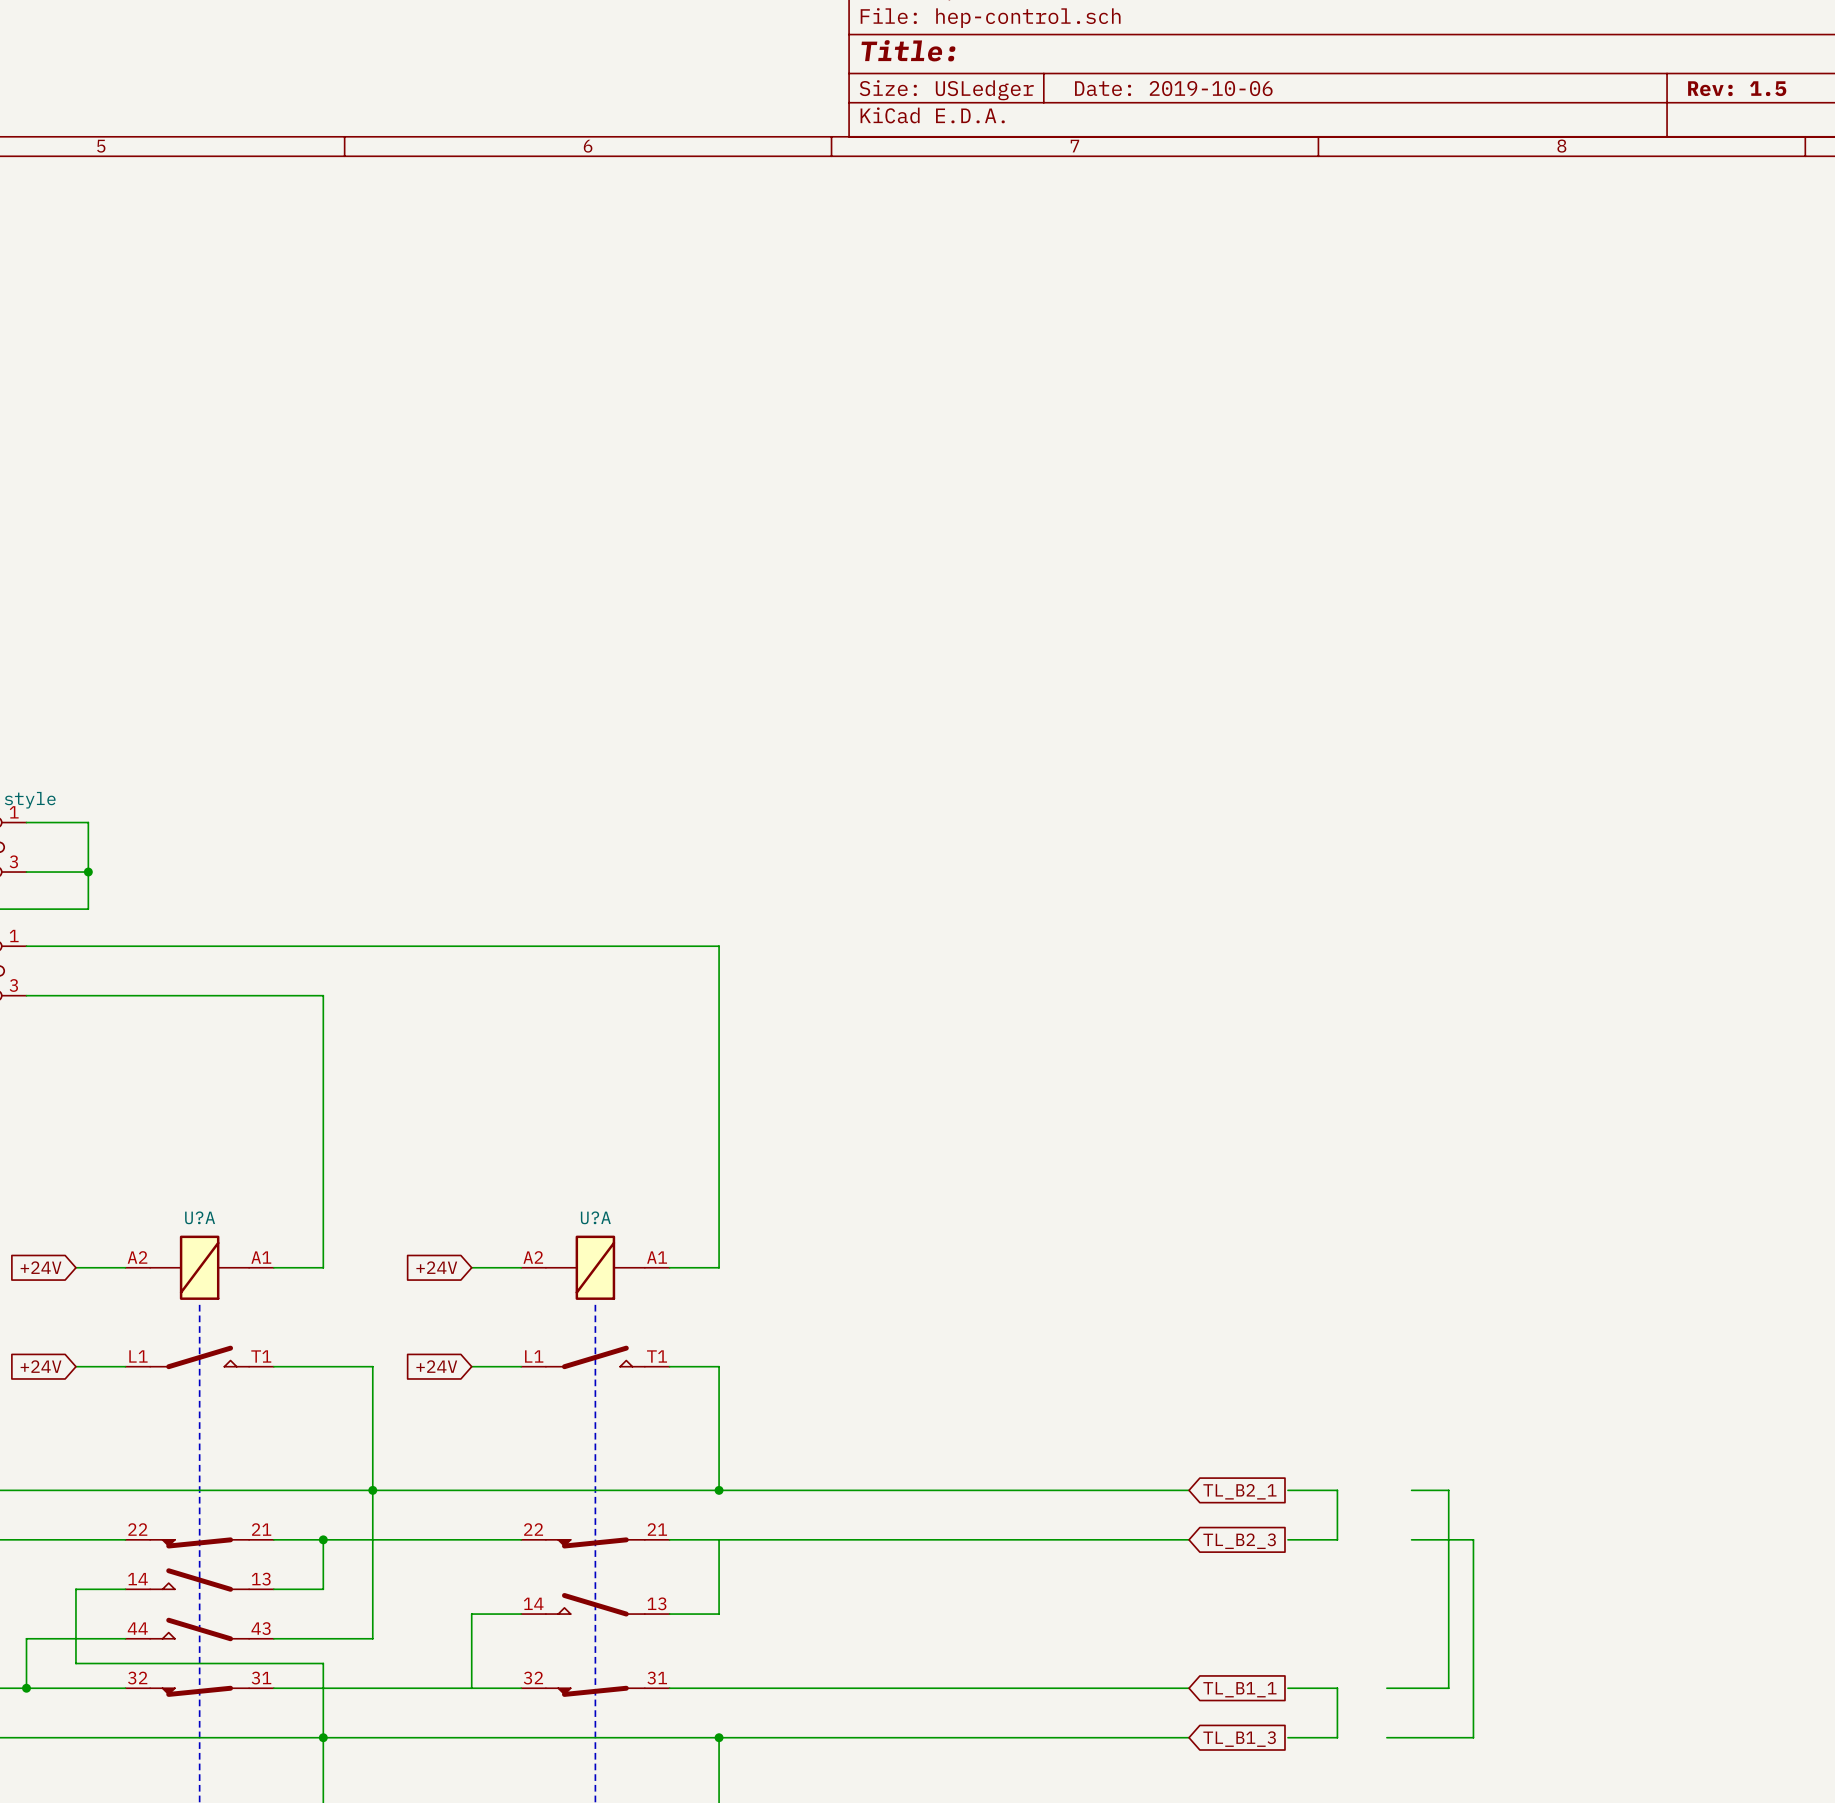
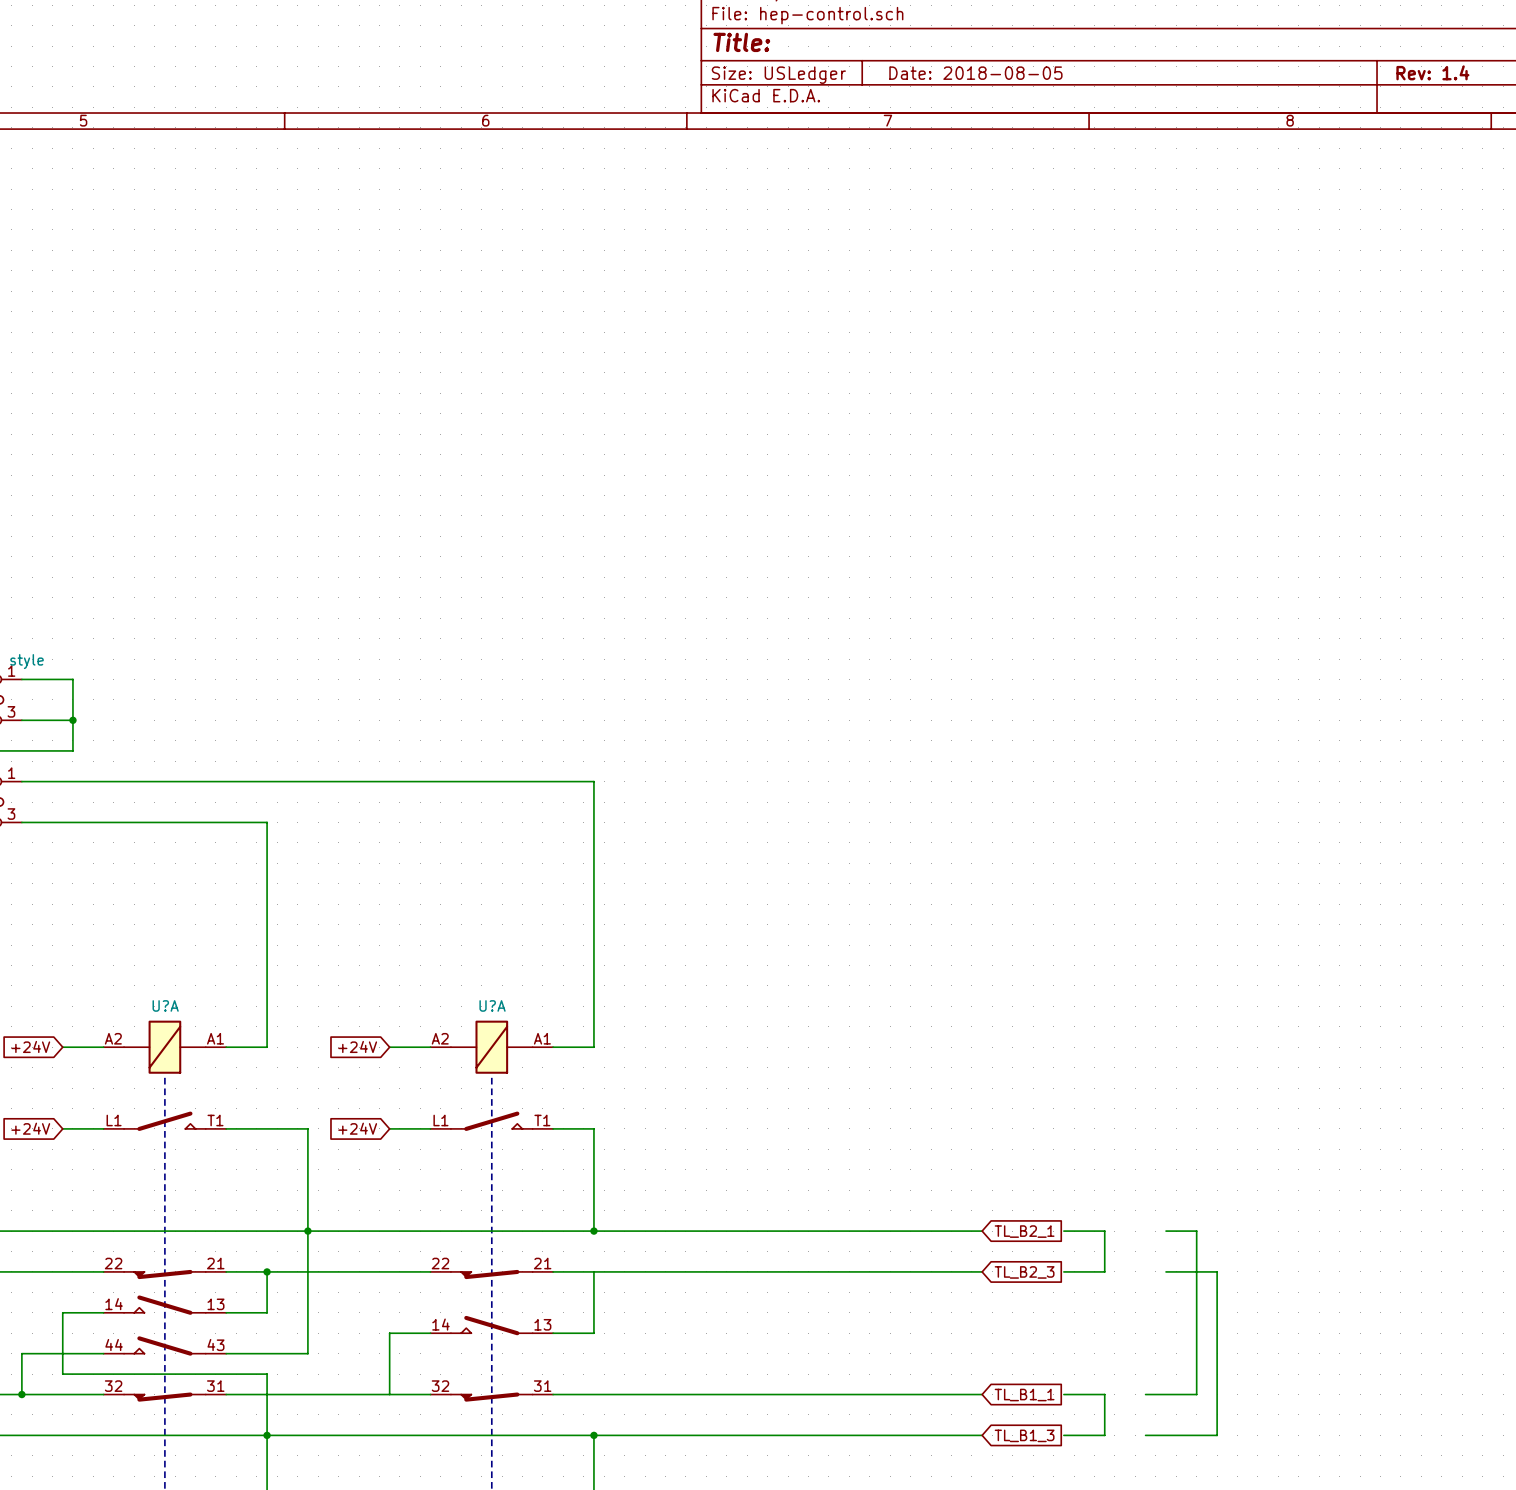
title block: Date: 2019-10-06 (1173, 88) -> Date: 2018-08-05 (975, 73)
title block: Rev: 1.5 (1737, 88) -> Rev: 1.4 (1432, 72)

